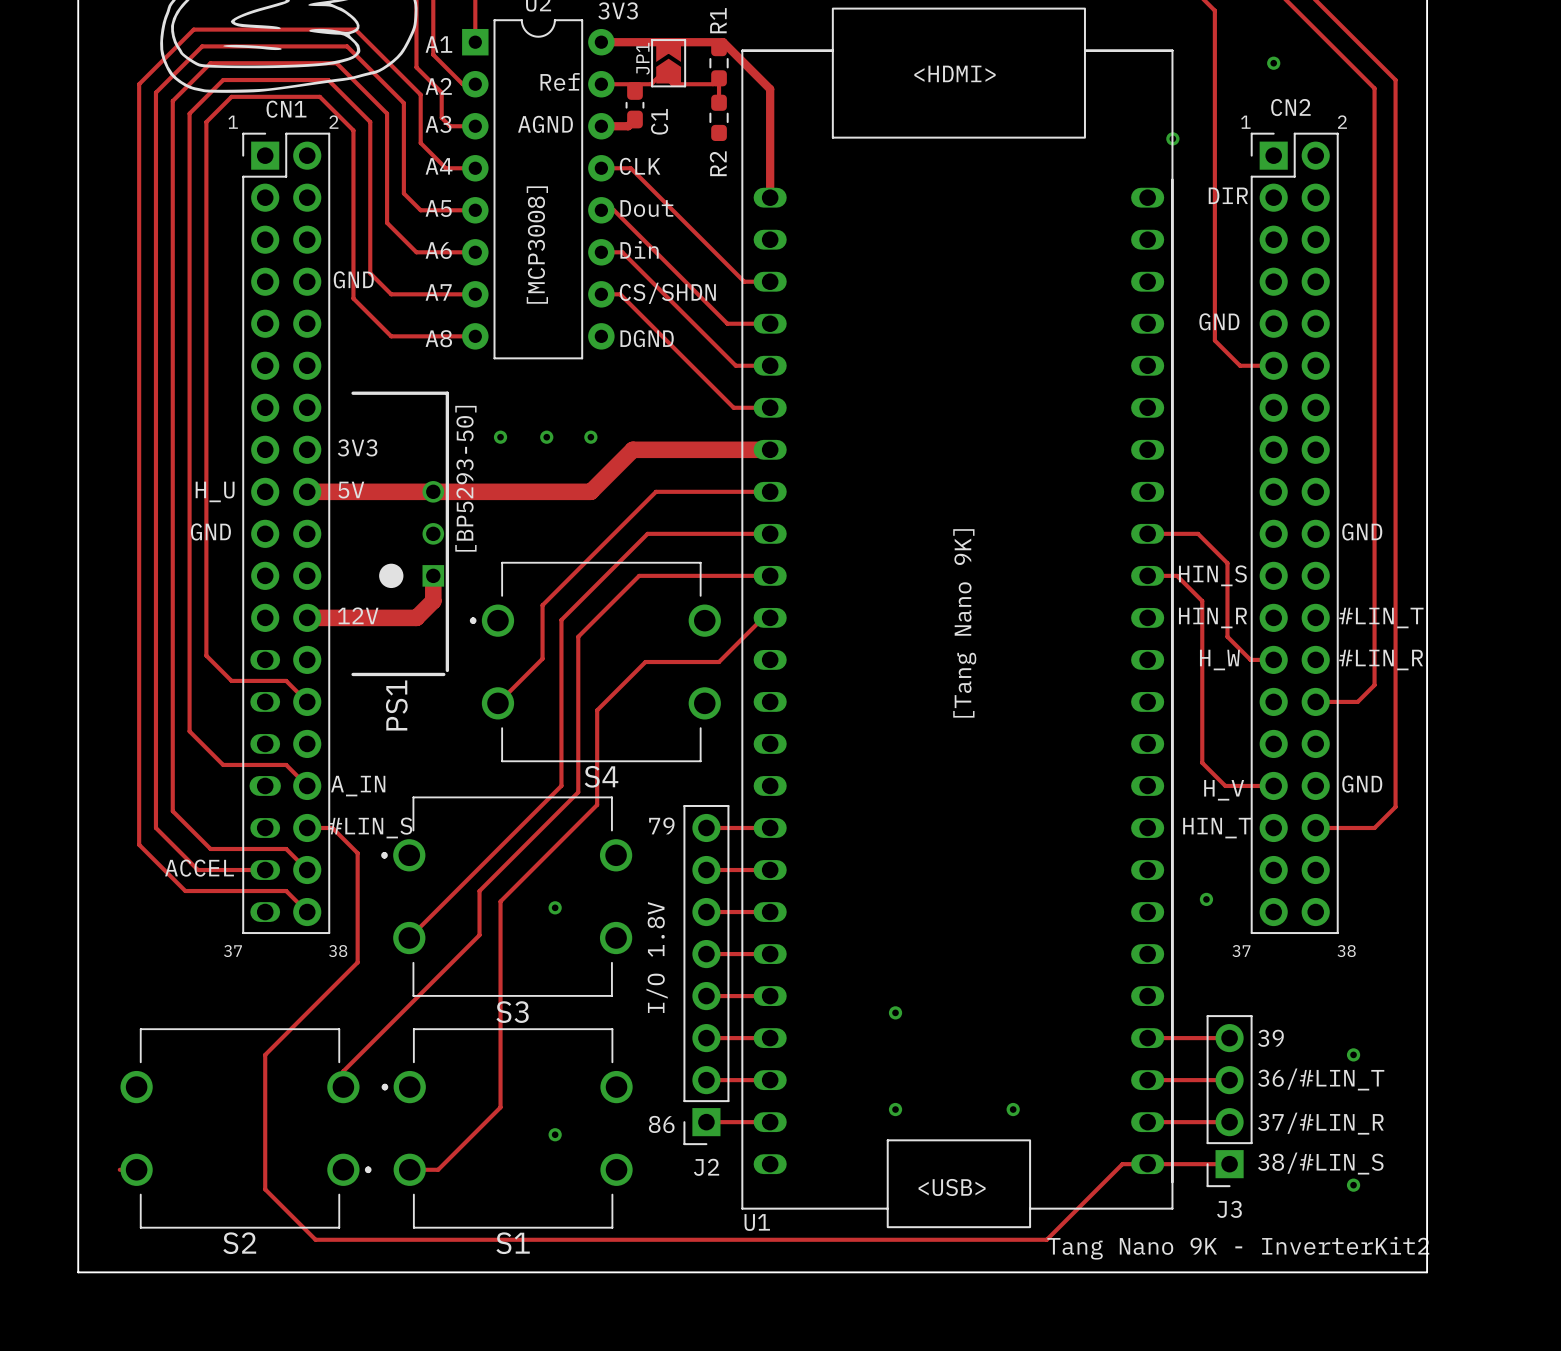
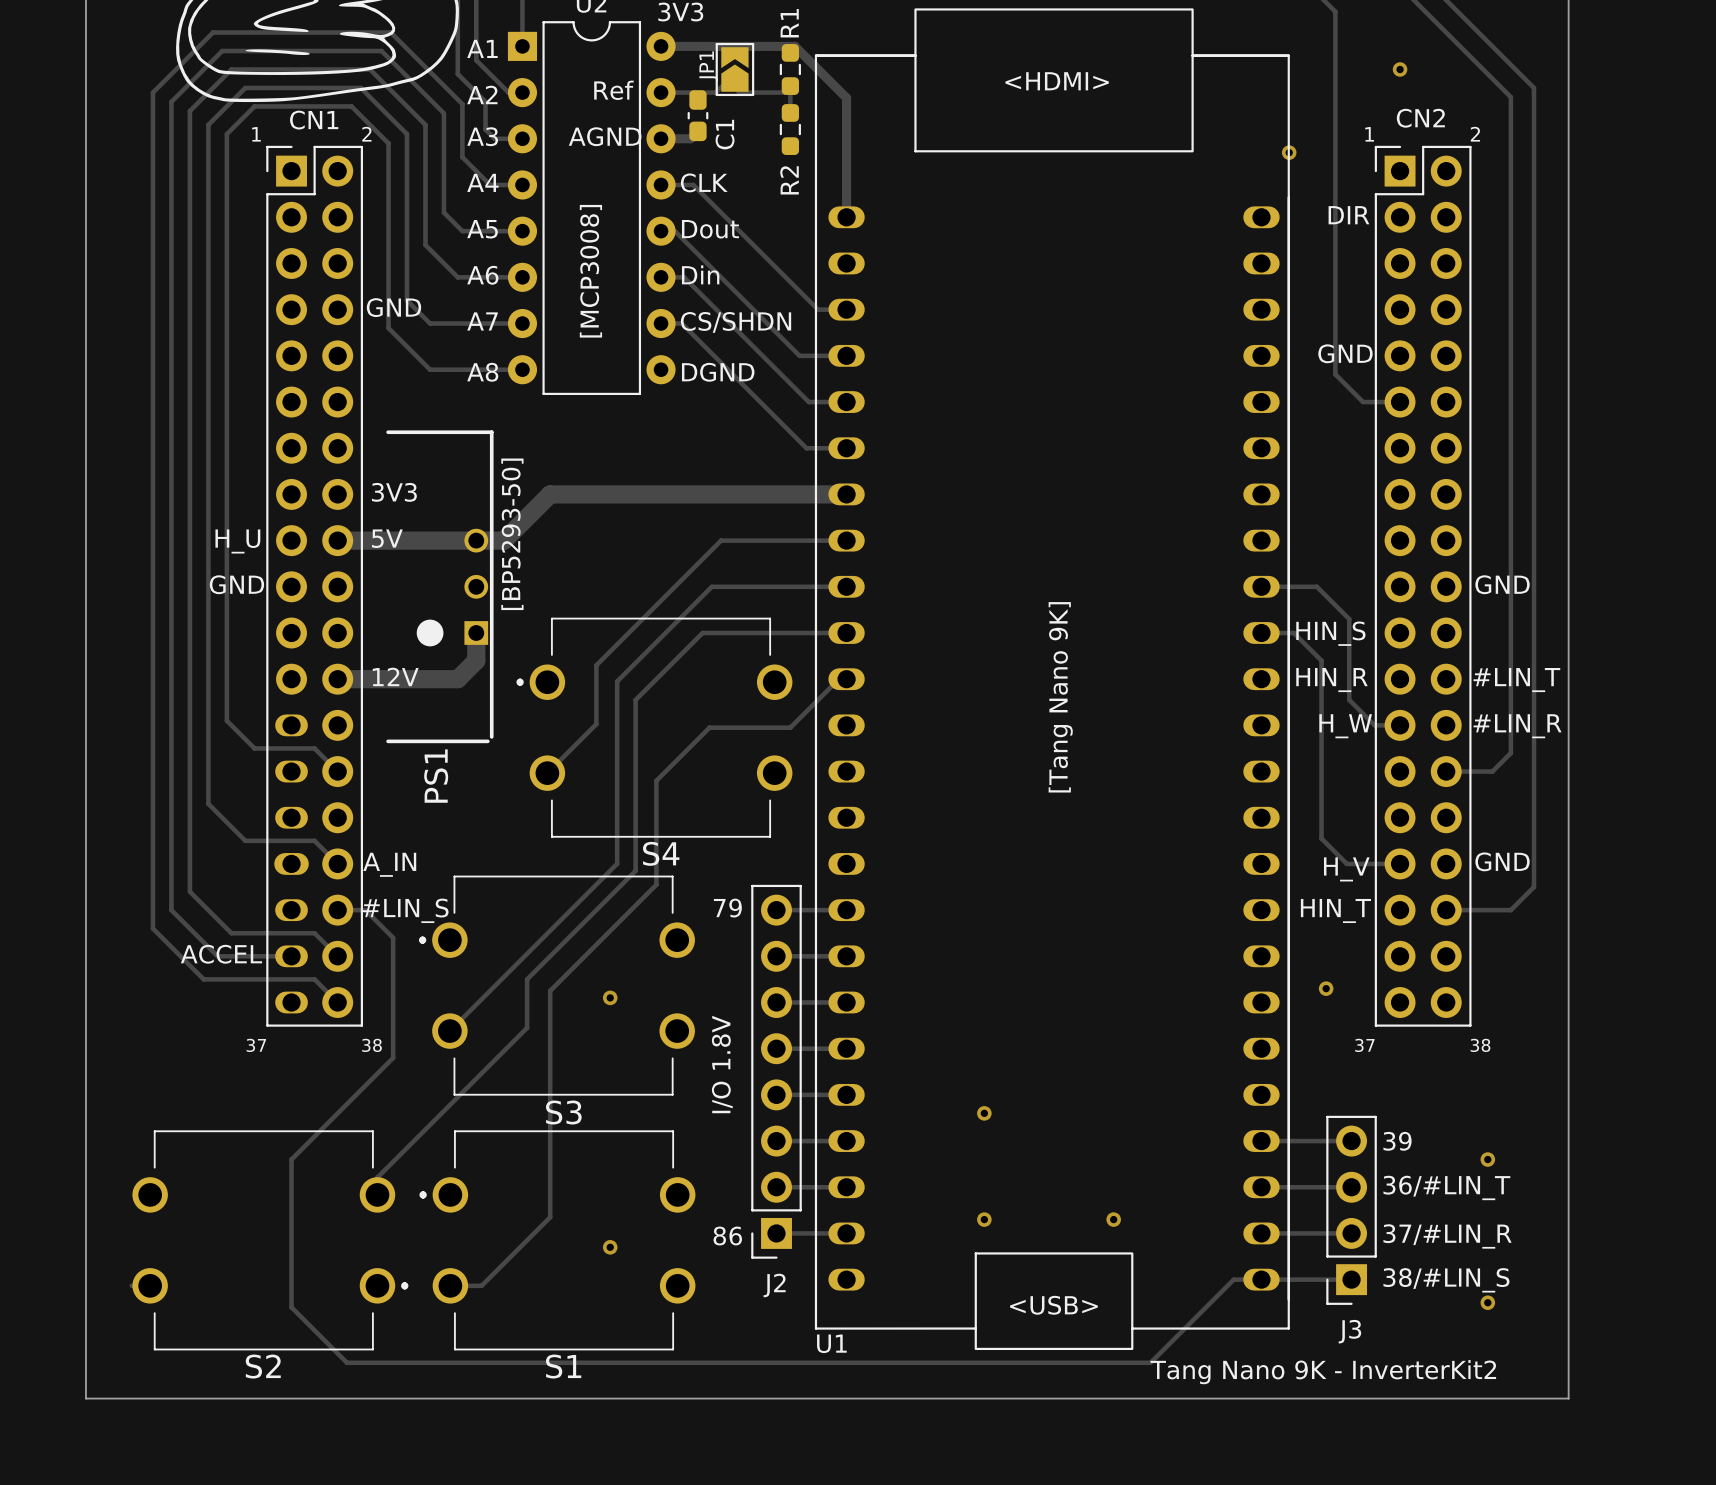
via: (500, 437) -> none
via: (546, 437) -> none
via: (590, 437) -> none
track: (632, 449) (590, 491) (458, 491) -> (695, 494) (550, 494) (503, 540)

